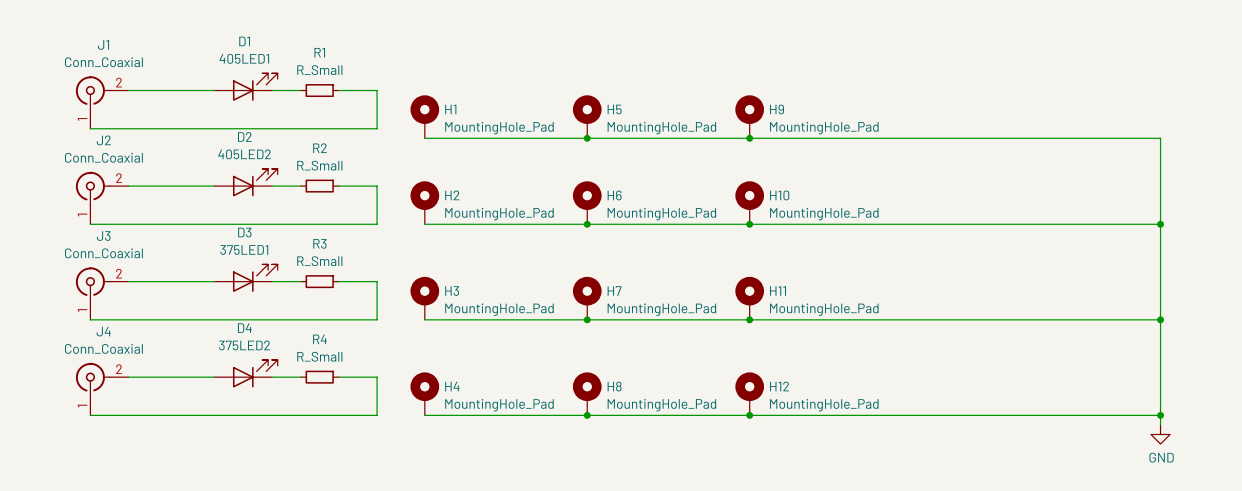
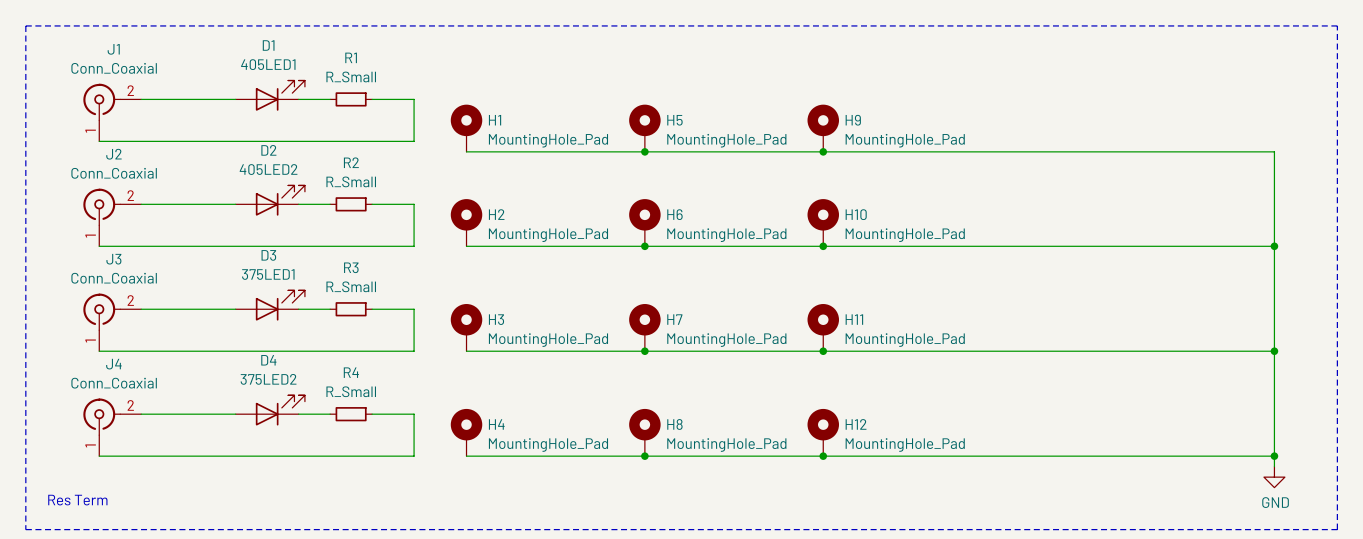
line: none -> (25, 25) (1337, 25) (1337, 529) (25, 529) (25, 25)
text: none -> Res Term (77, 500)

